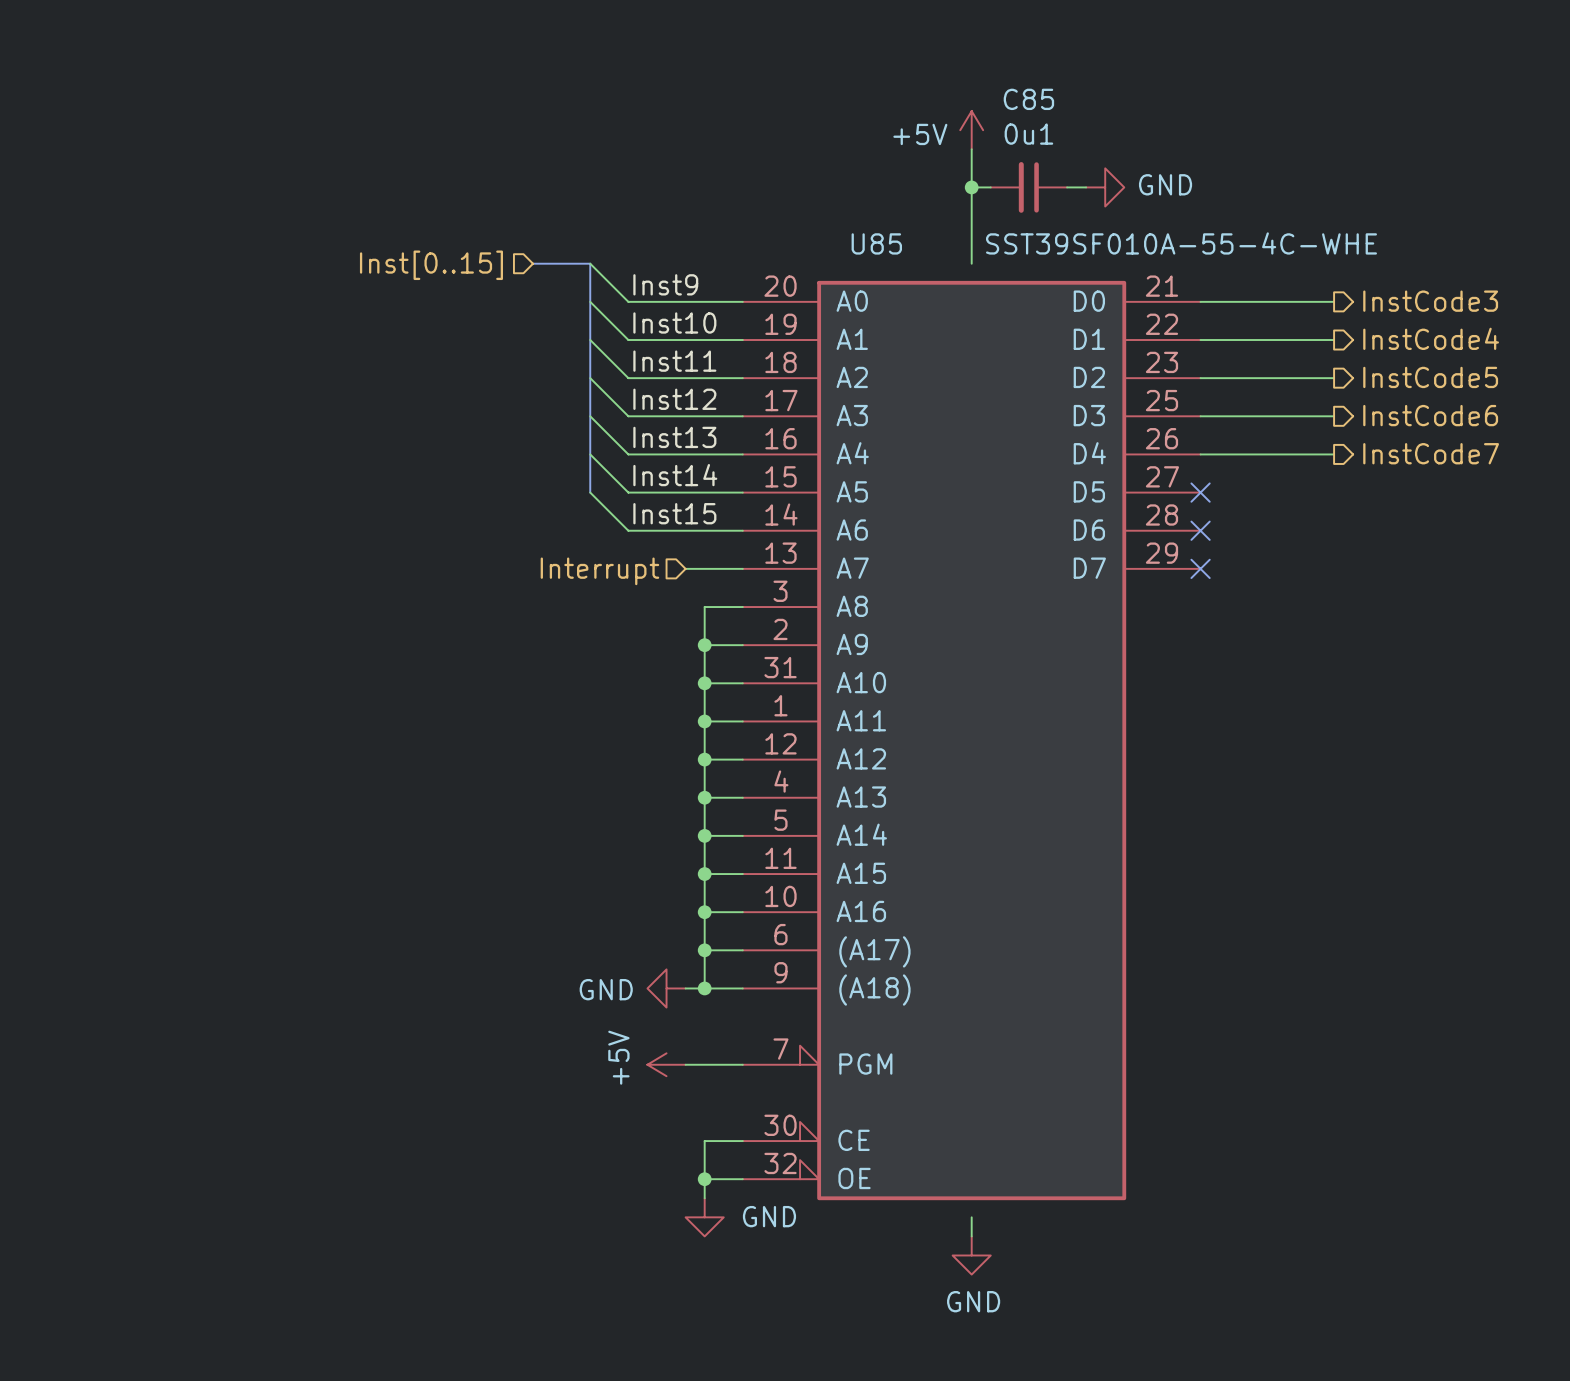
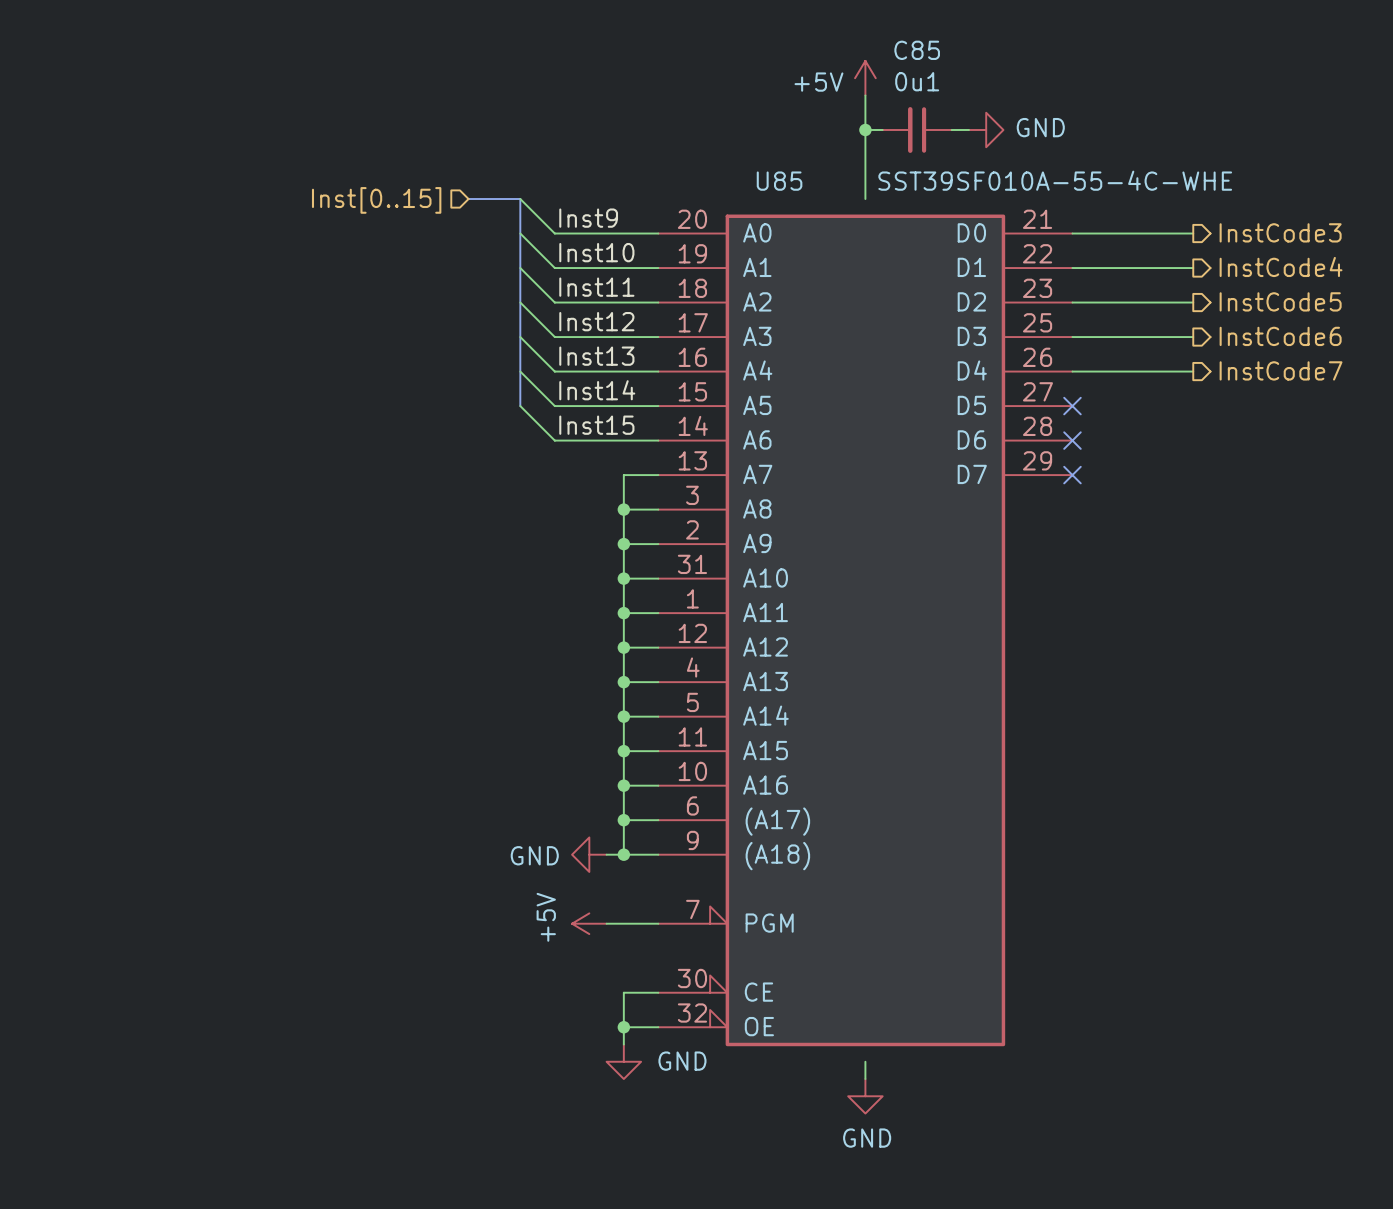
wire: (685, 568) (704, 568) -> (623, 509) (623, 475)
hierarchical label: Interrupt (599, 571) -> none
junction: none -> (623, 509)

